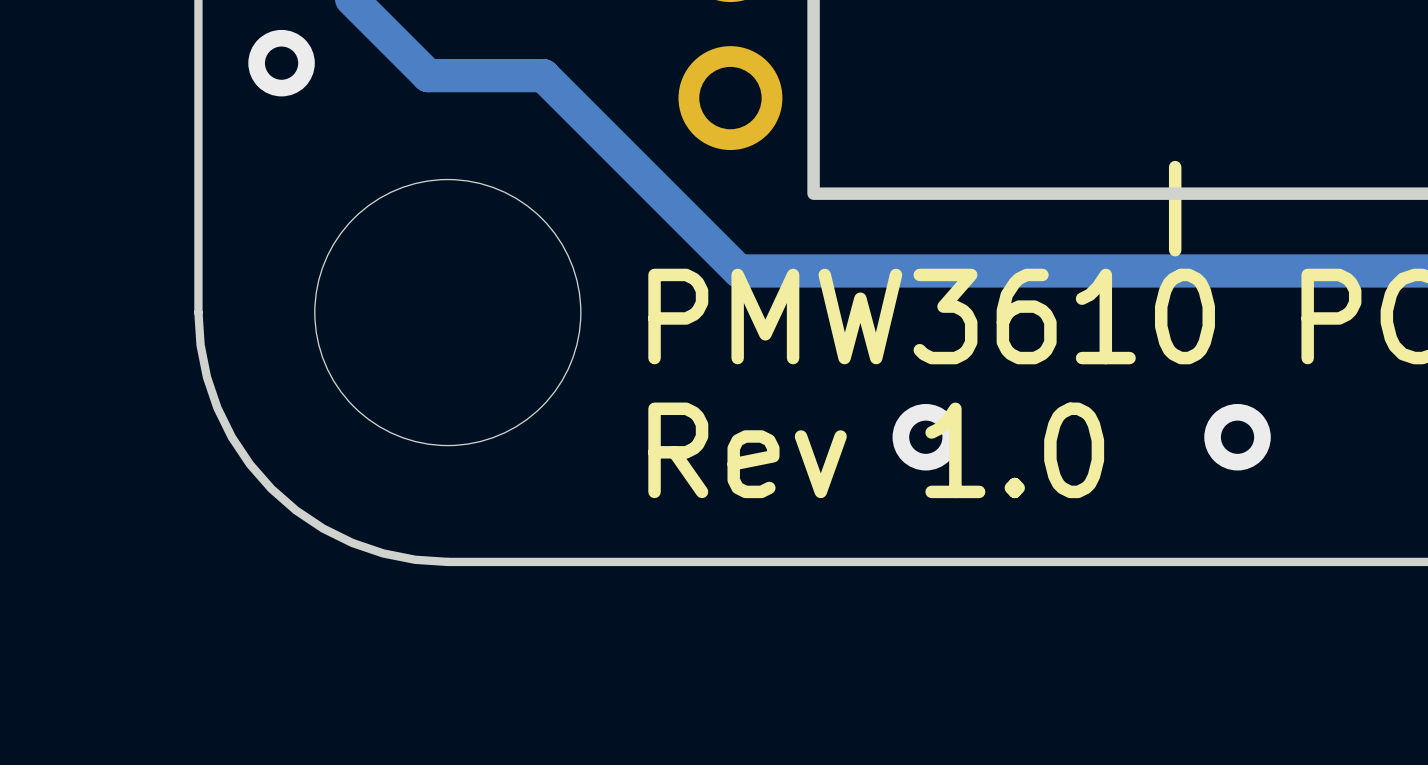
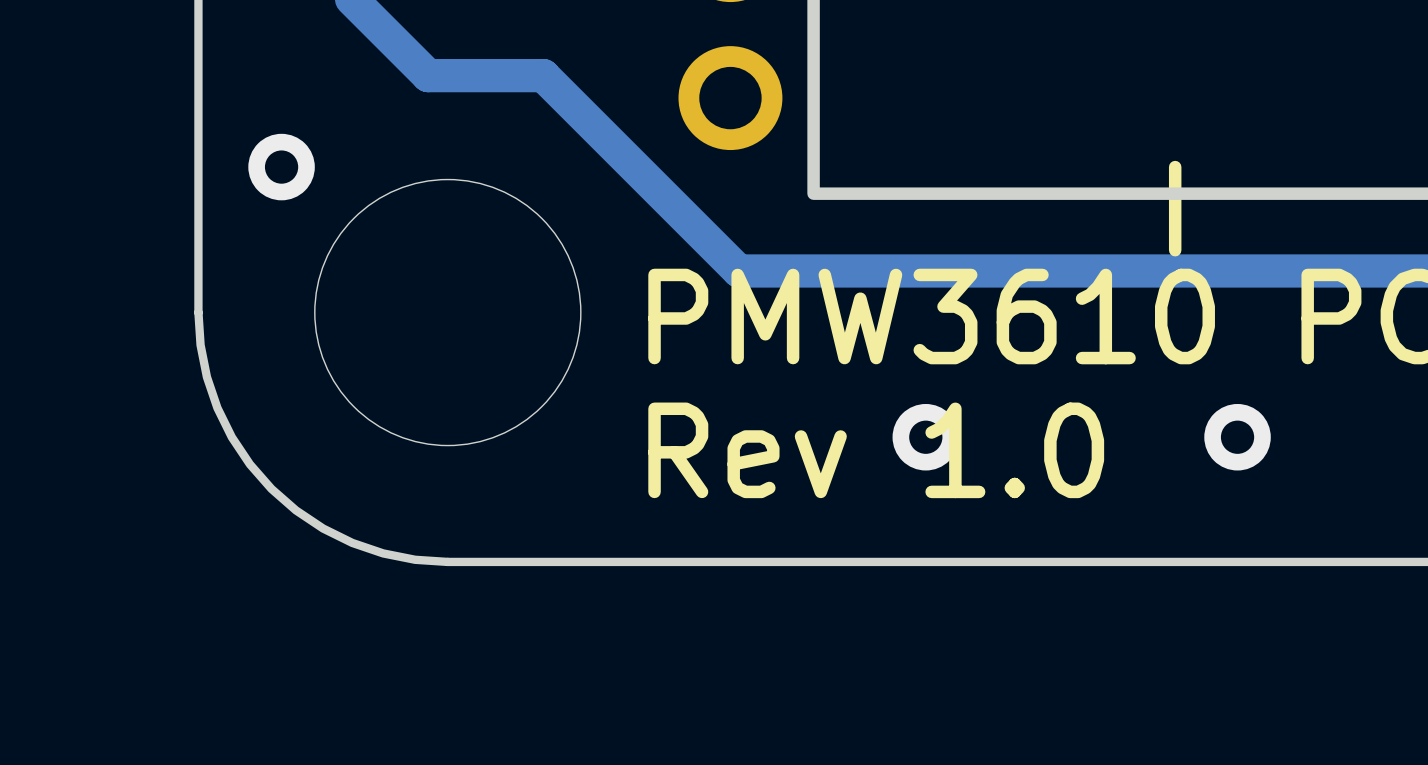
via position: (281, 63) -> (281, 167)

